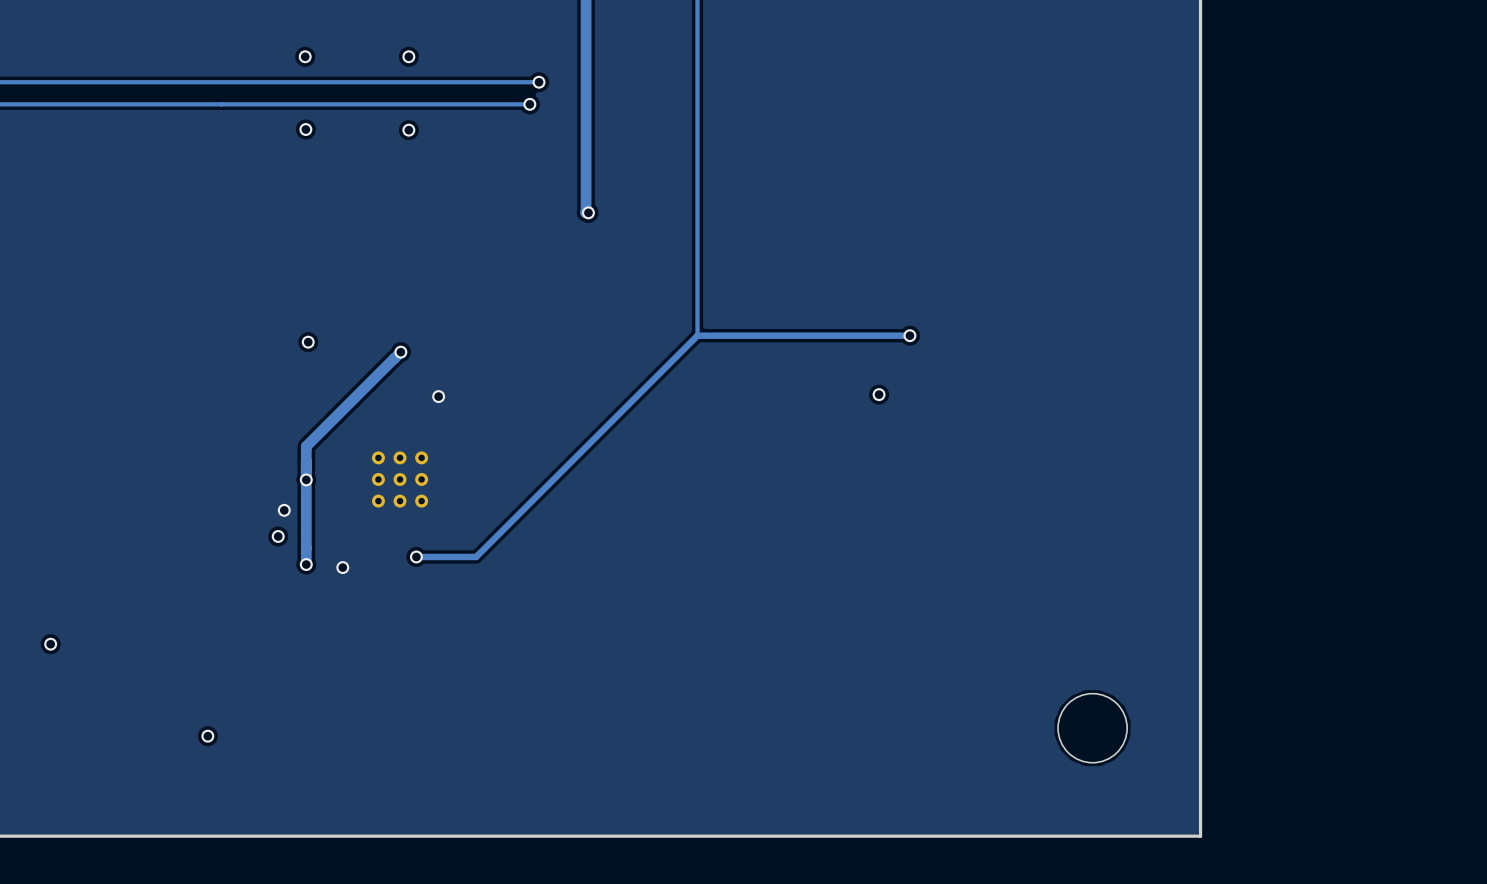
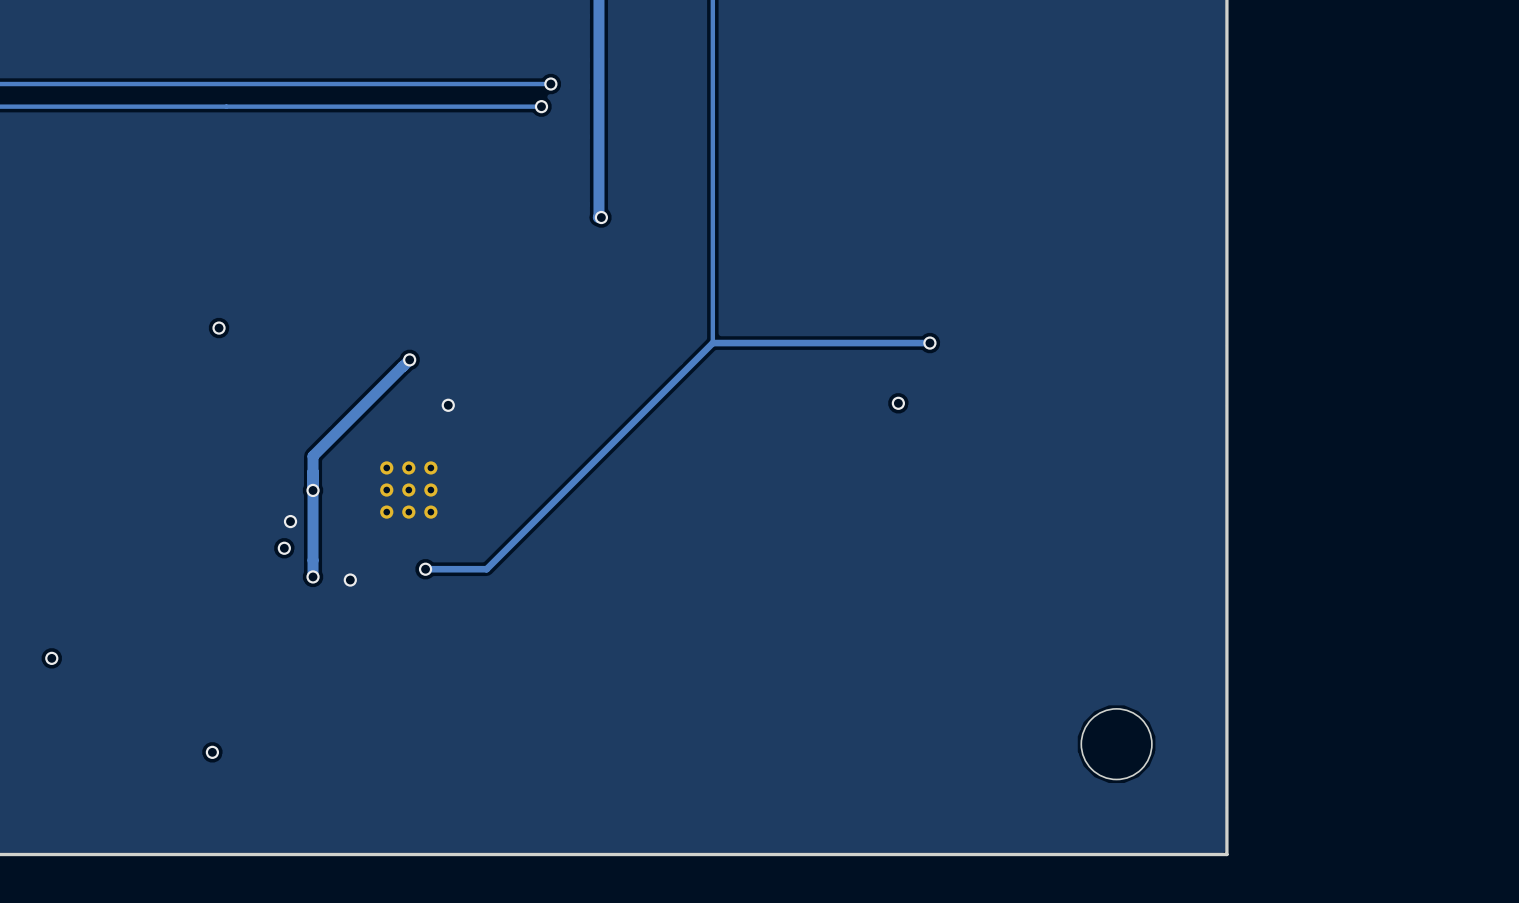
via: (305, 56) -> none
via: (408, 56) -> none
via: (305, 129) -> none
via: (408, 130) -> none
via position: (308, 342) -> (219, 328)

